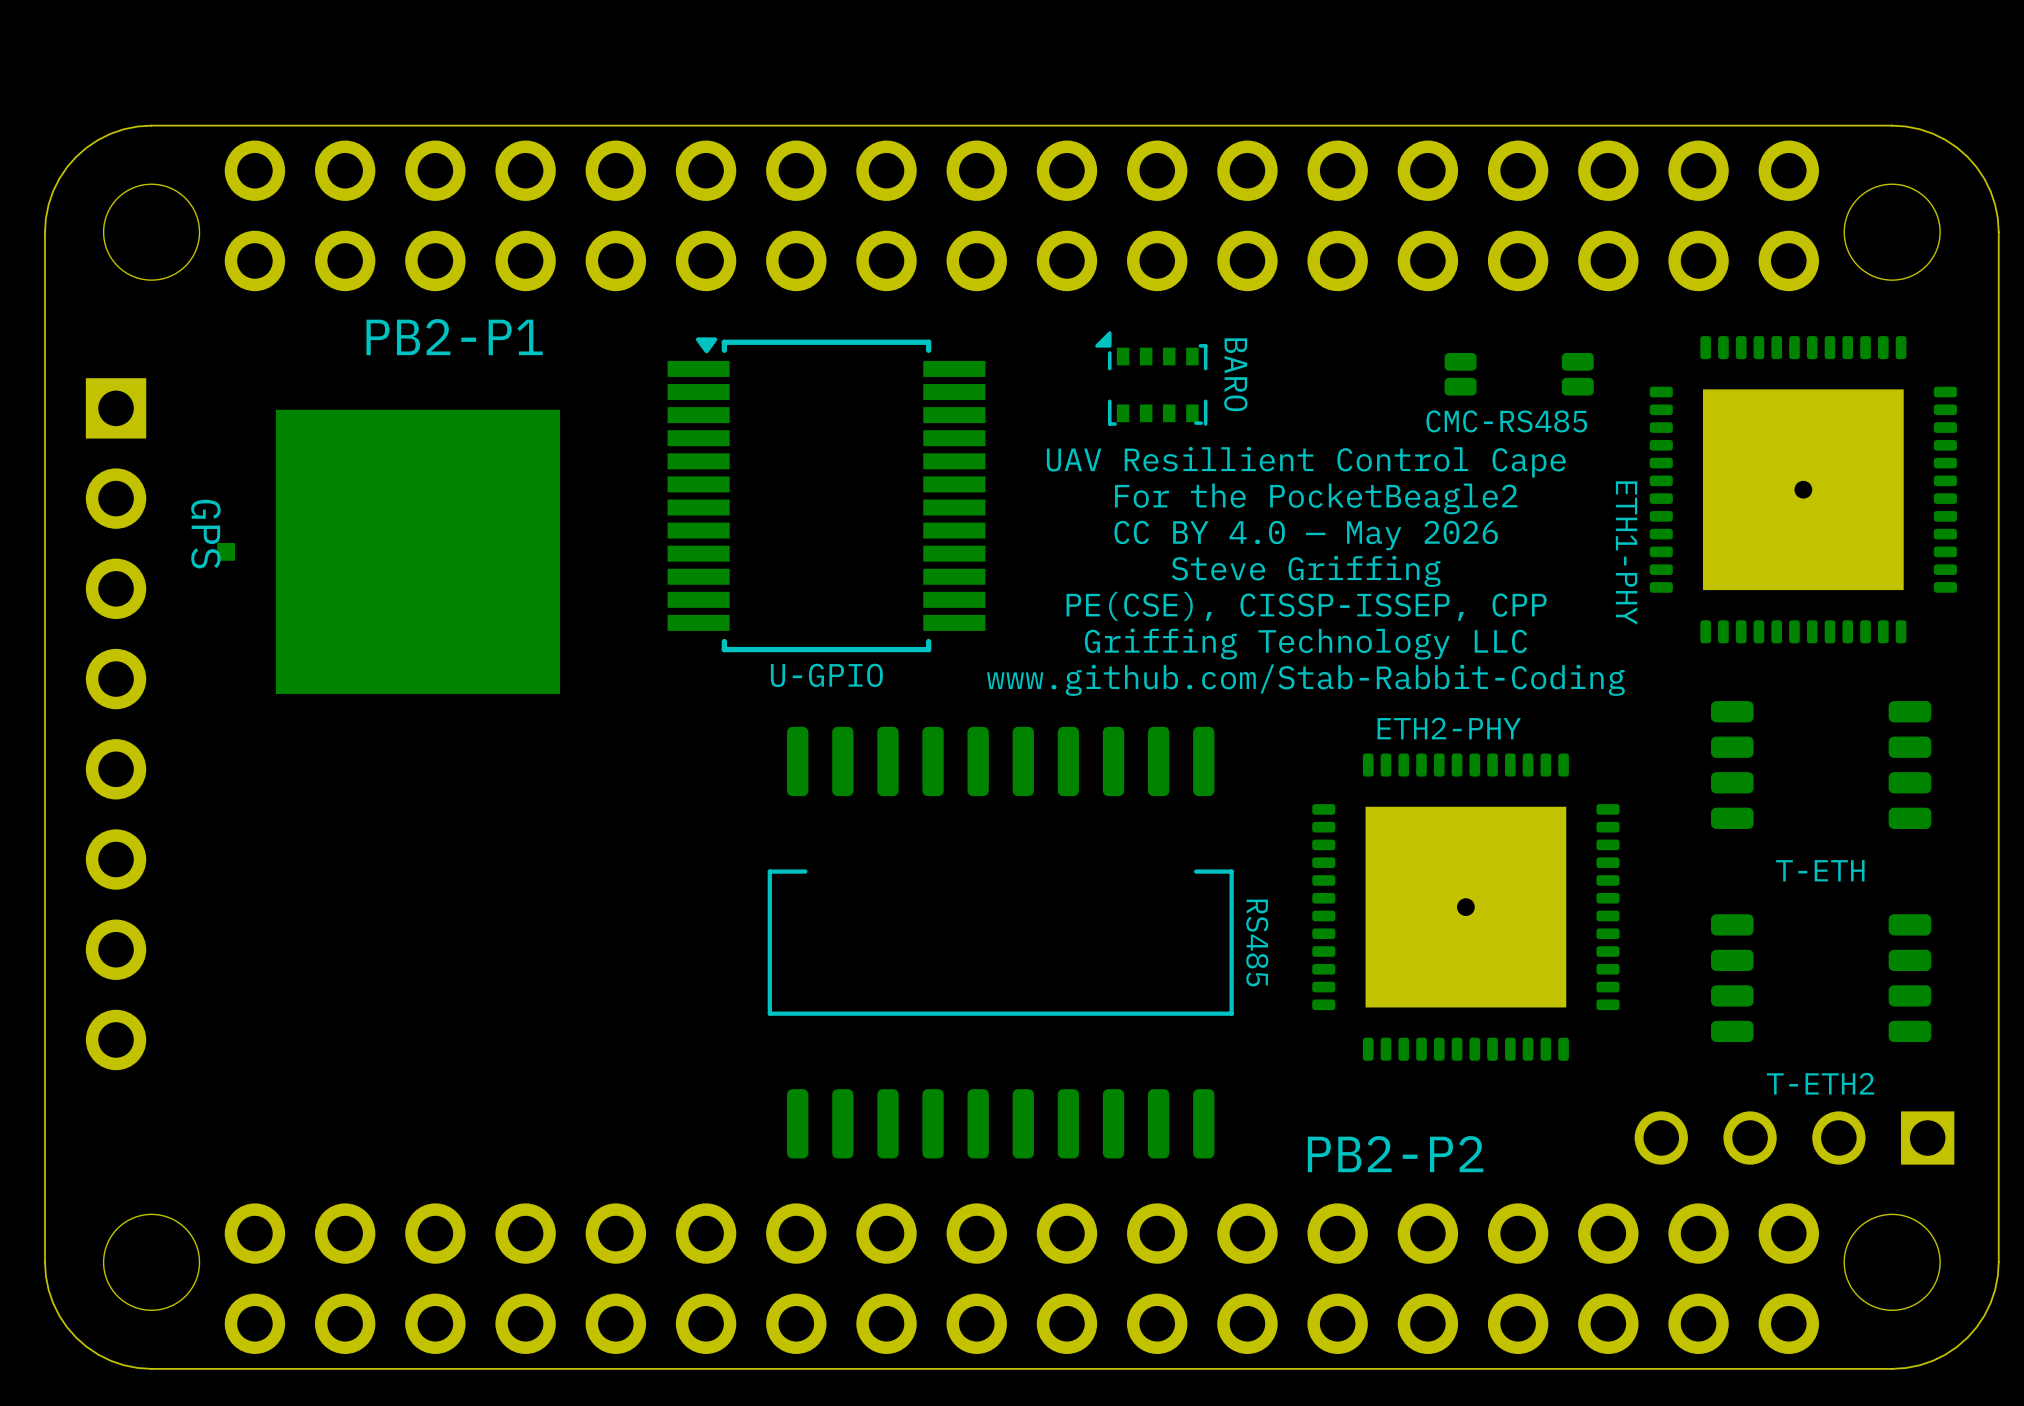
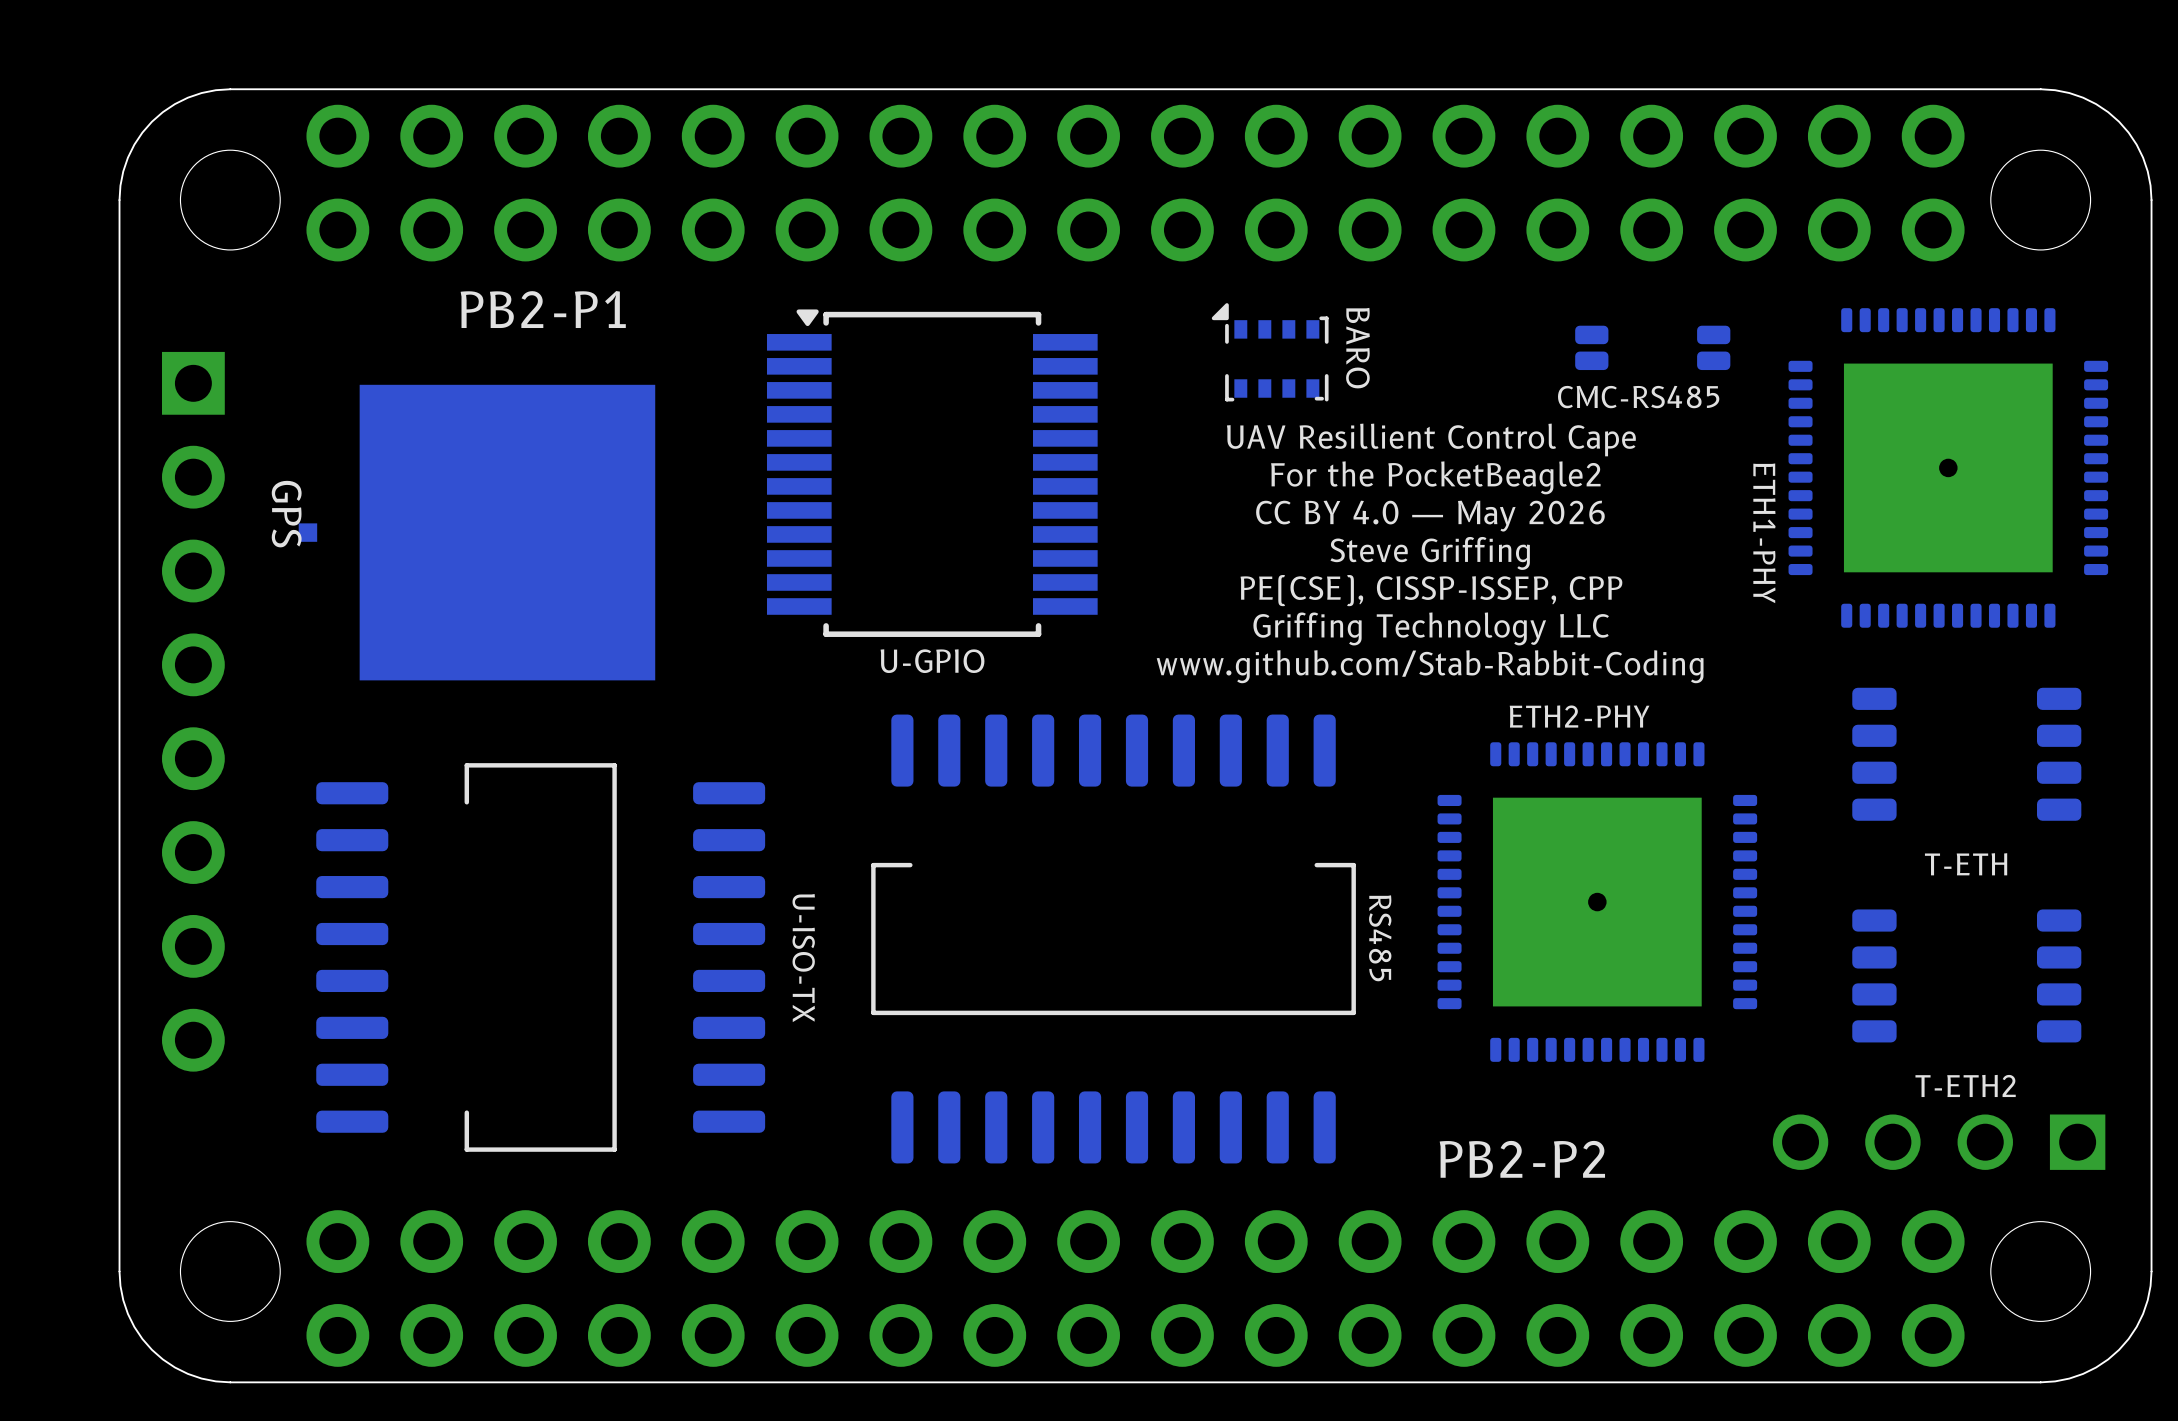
U-ISO-TX: none -> (540, 957)

